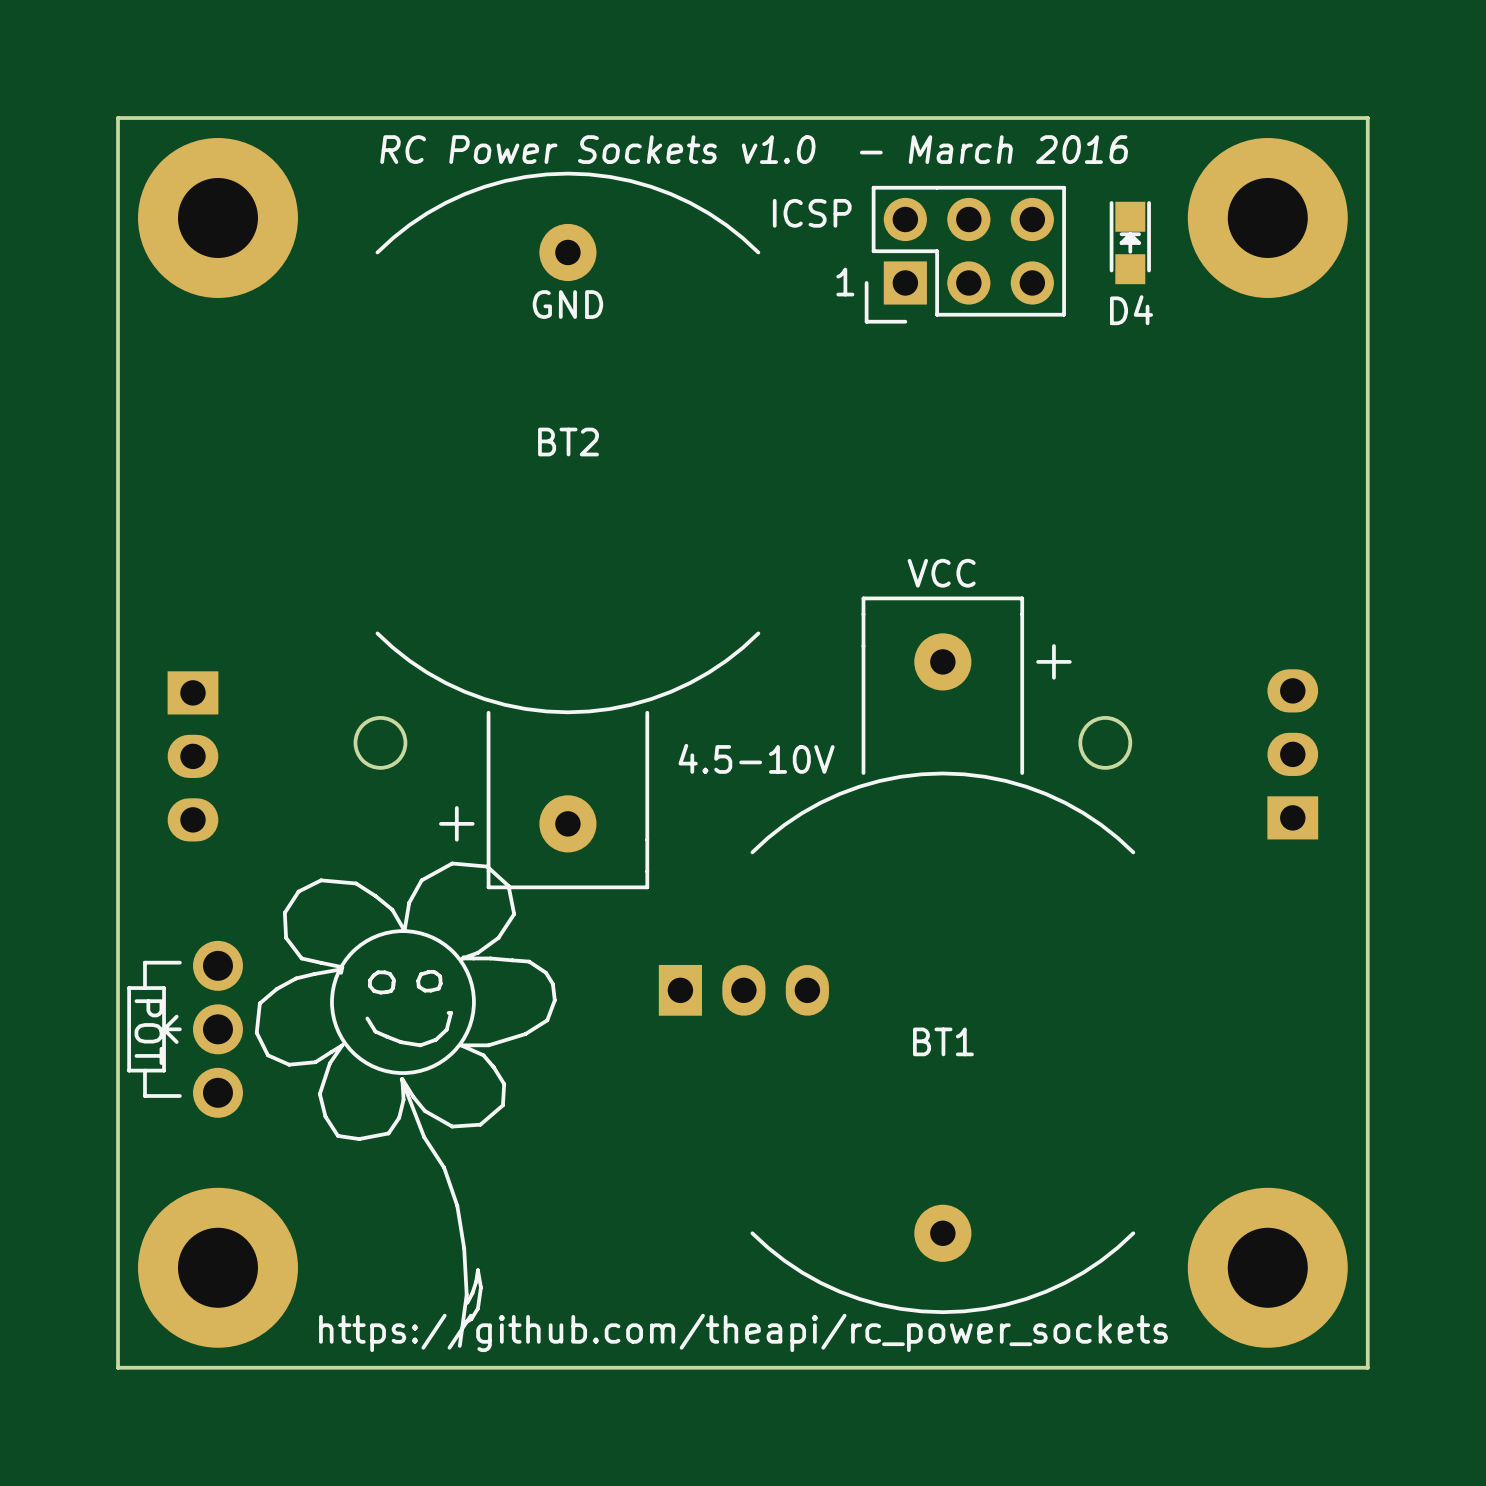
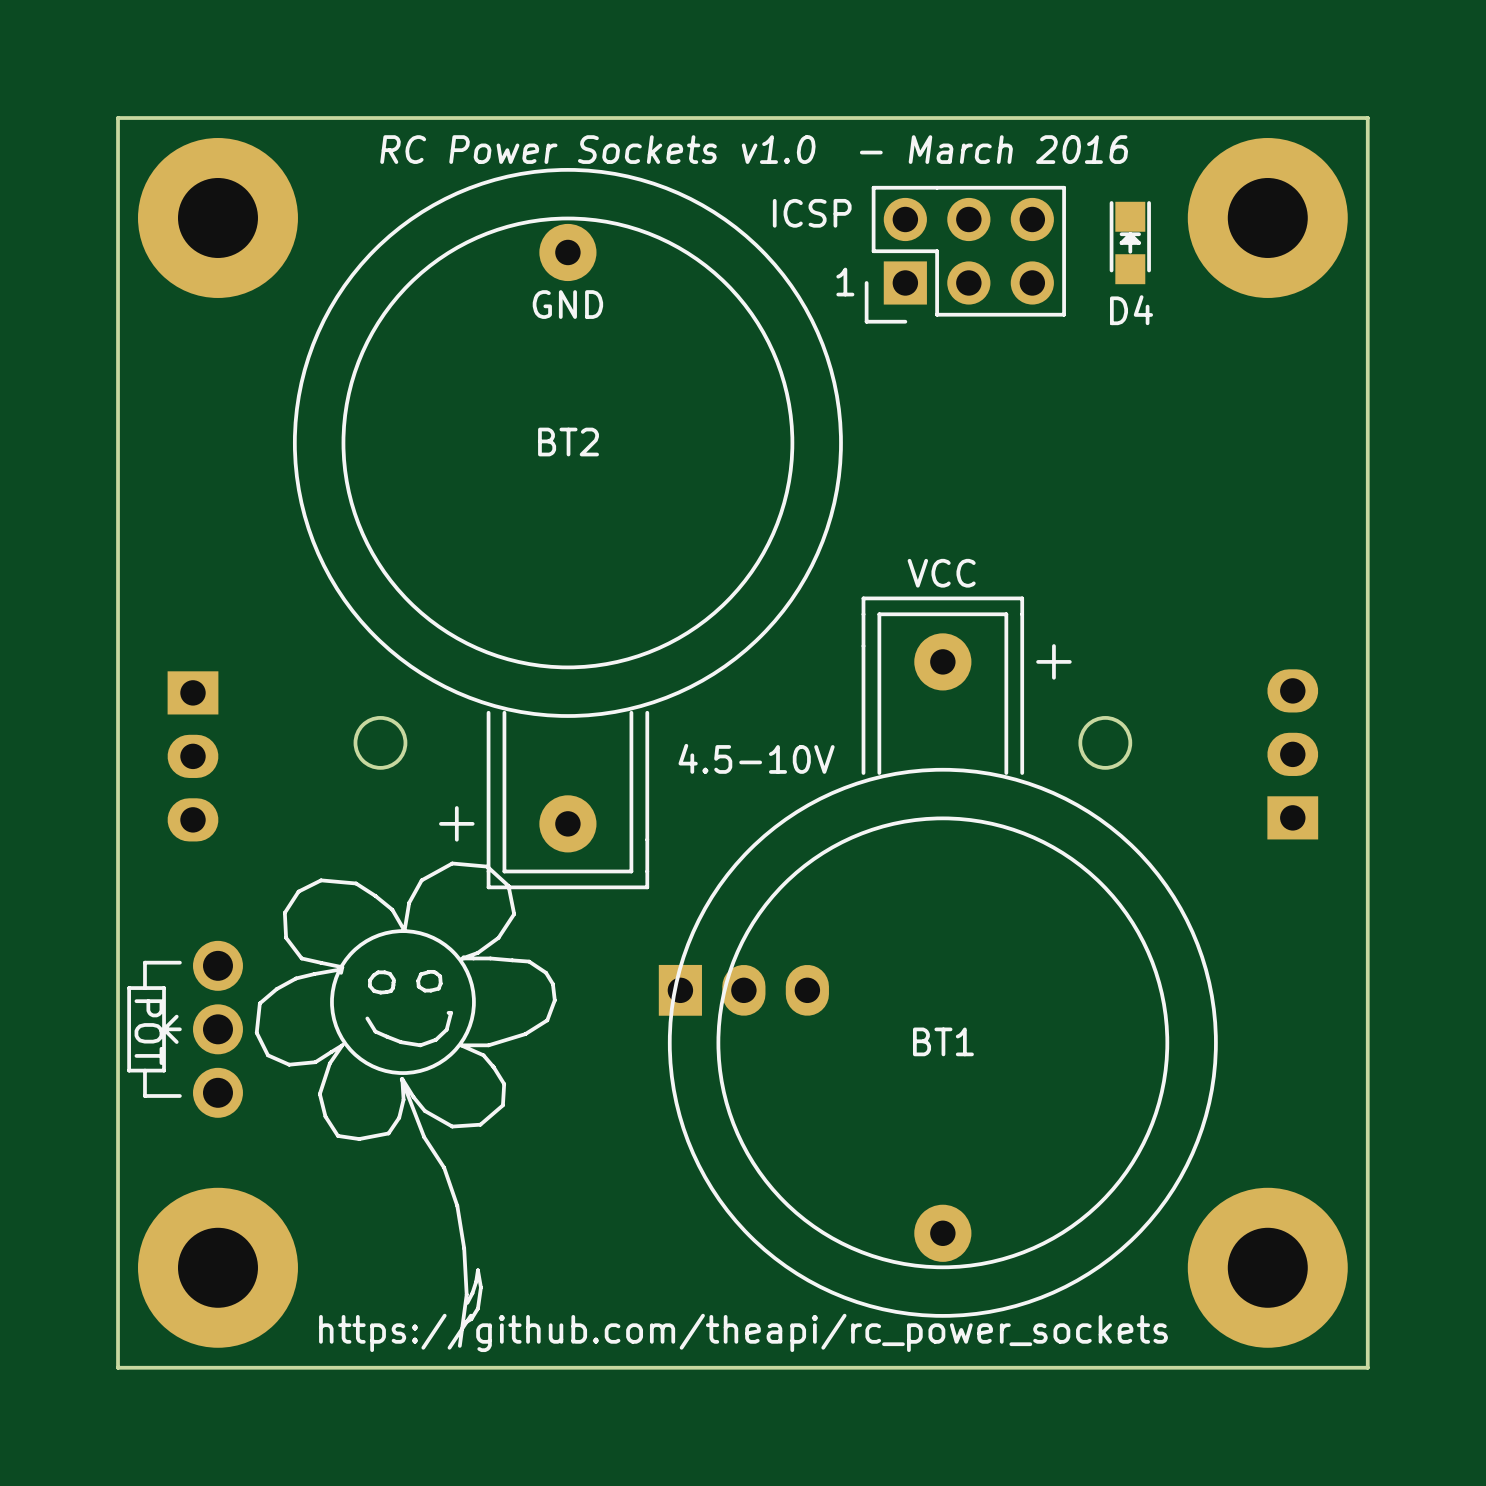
BT2 footprint: [375, 171, 761, 890] -> [292, 168, 843, 890]
BT1 footprint: [750, 596, 1136, 1315] -> [667, 596, 1218, 1318]

